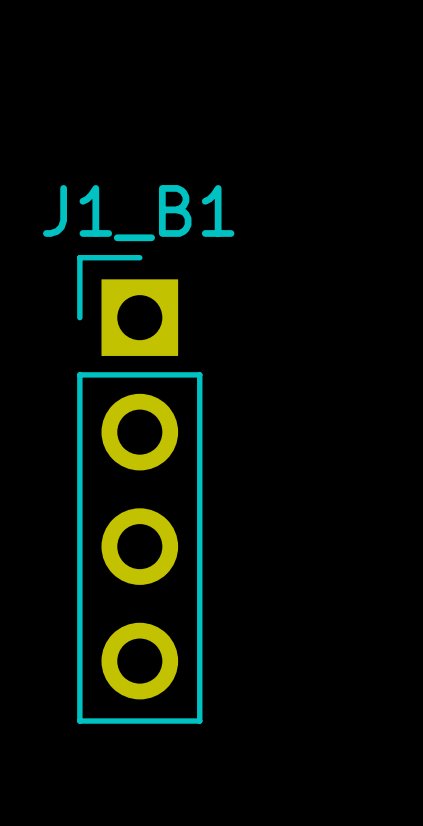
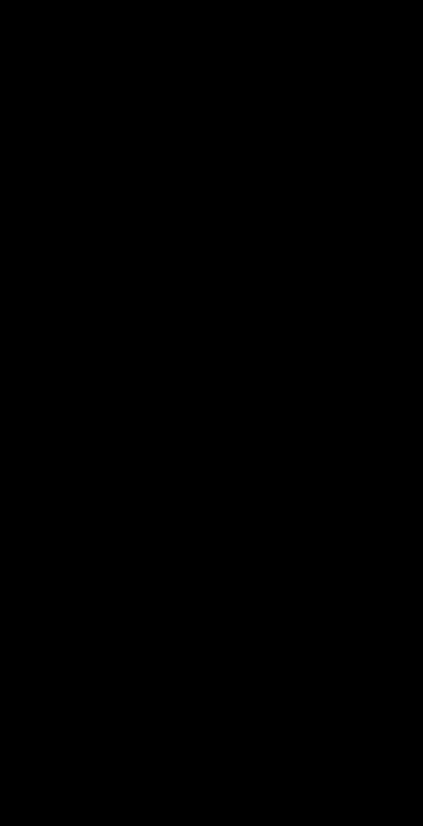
J1_B1: (139, 489) -> none

